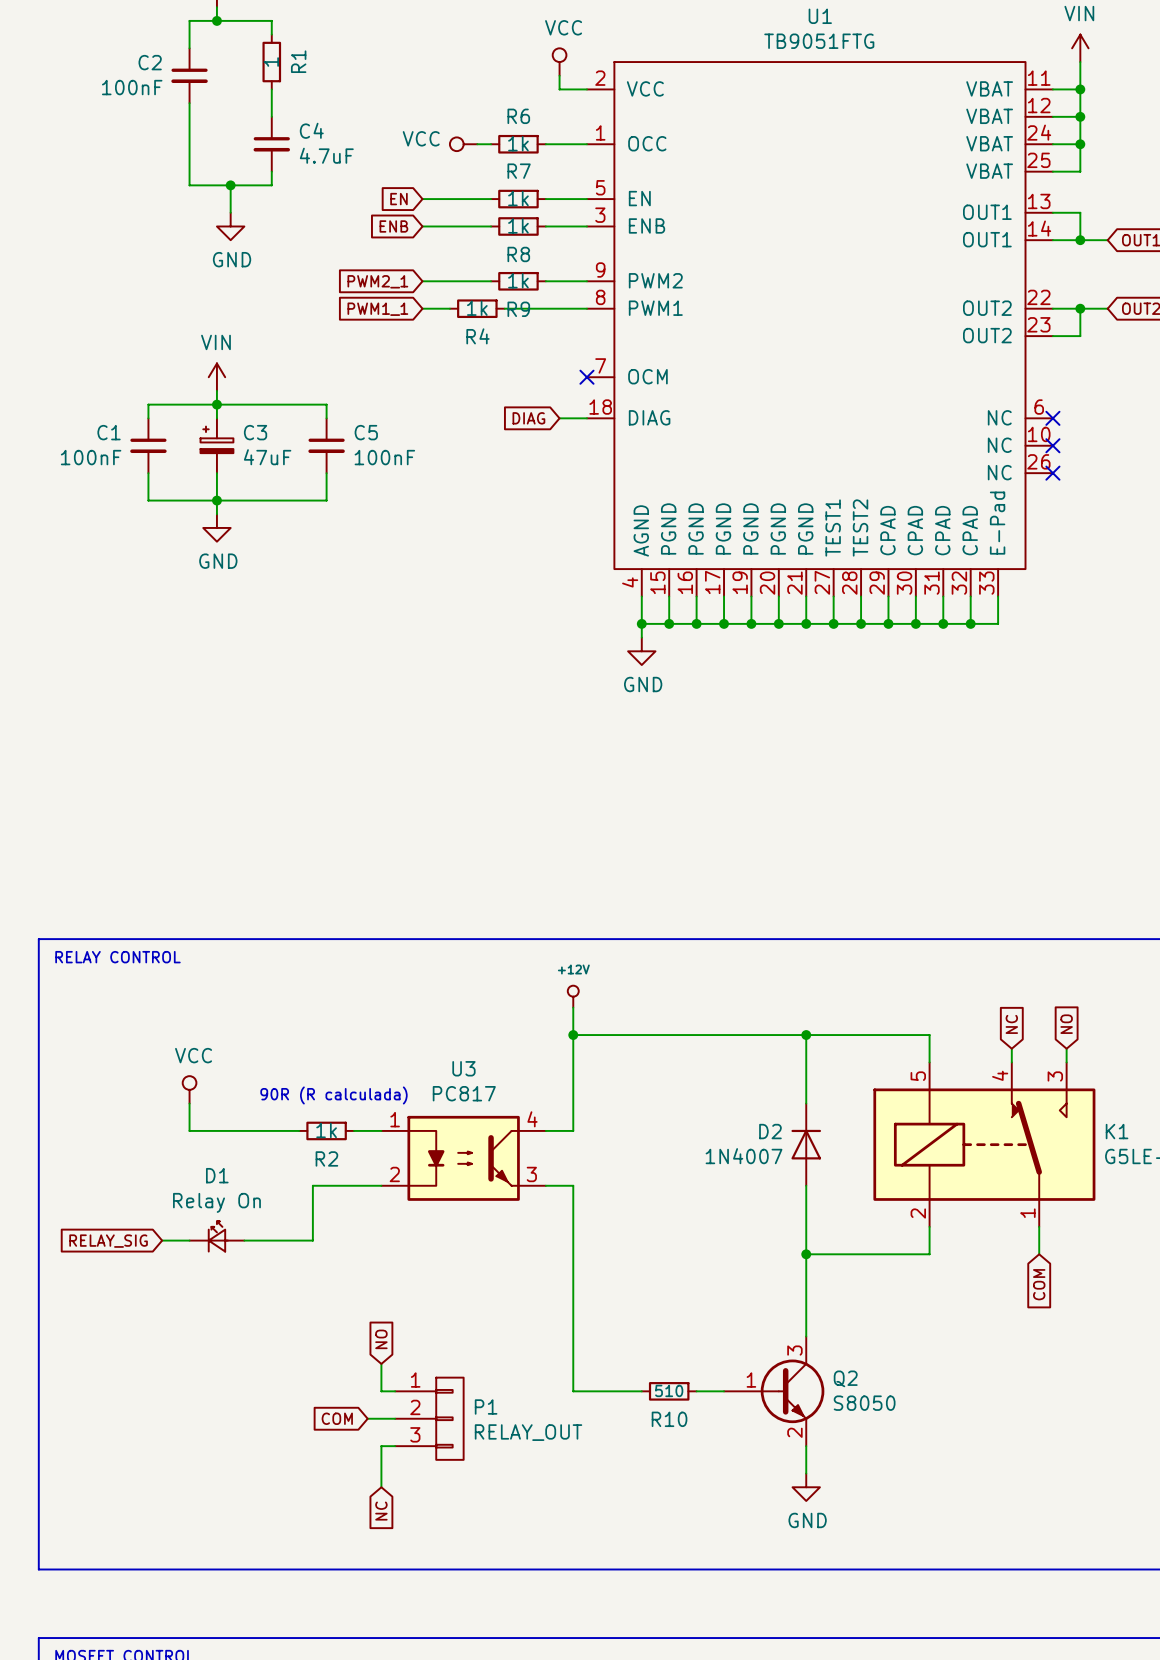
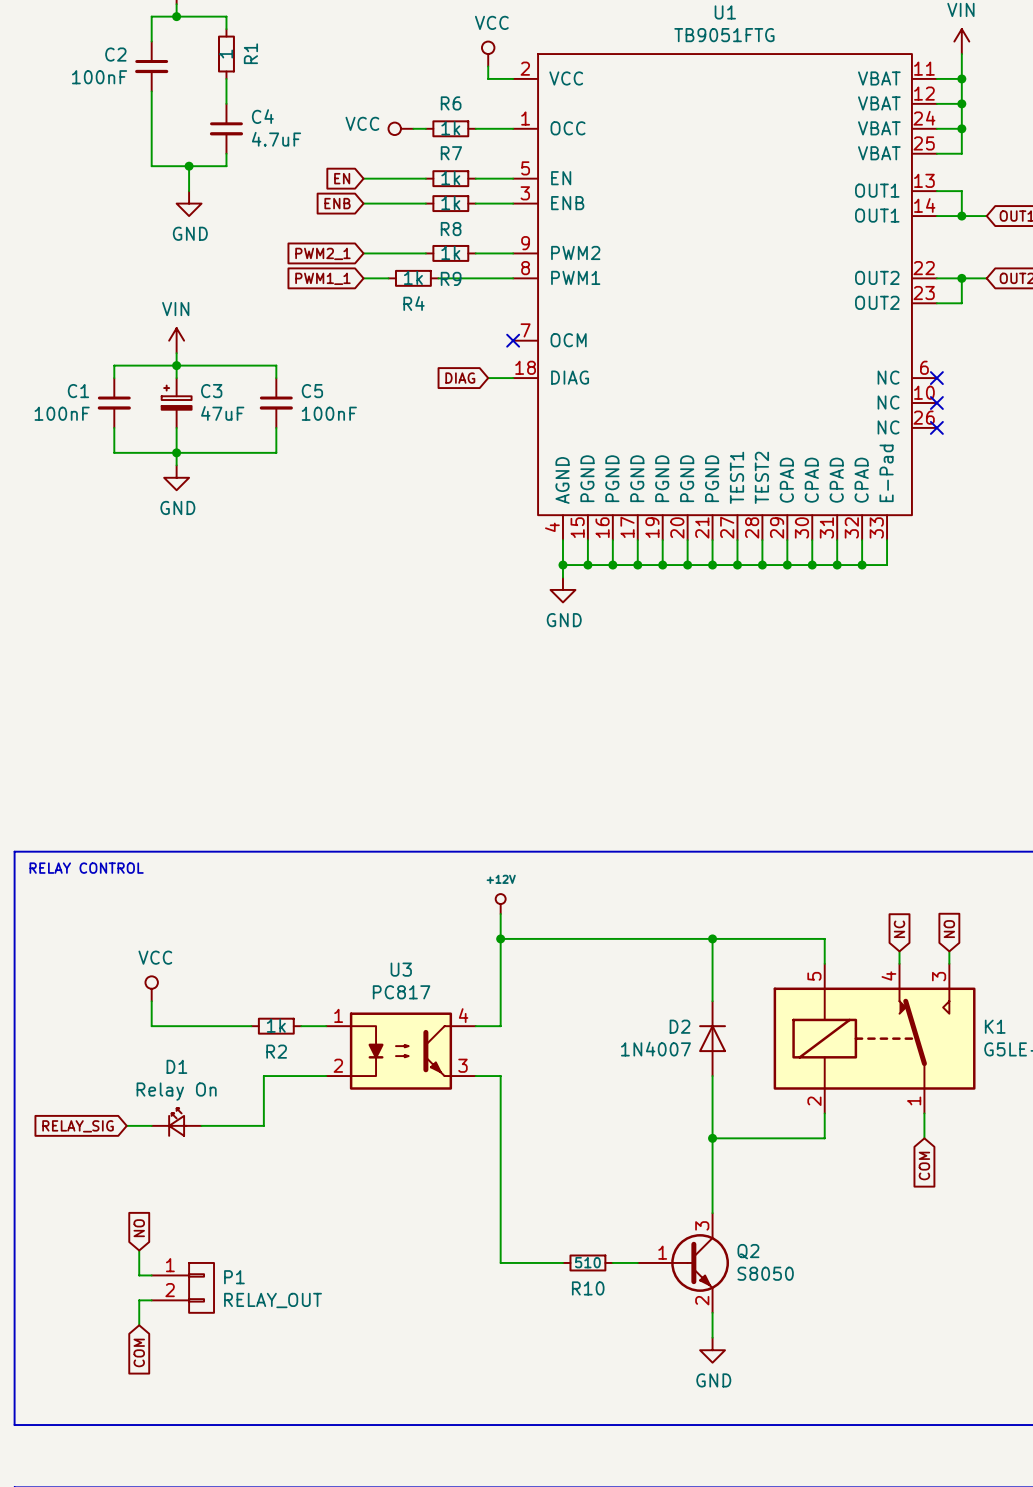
text: 90R (R calculada) (333, 1095) -> none
global label position: NO (381, 1339) -> NO (139, 1228)
wire: (381, 1363) (381, 1391) (395, 1391) -> (139, 1250) (139, 1275) (151, 1275)
P1 symbol: [395, 1377, 464, 1460] -> [151, 1262, 215, 1313]
global label rotation: 0° (337, 1418) -> 90° counterclockwise (139, 1352)
global label position: COM (337, 1418) -> COM (139, 1352)
wire: (367, 1418) (395, 1418) -> none
wire: none -> (151, 1300) (139, 1300) (139, 1325)
wire: (395, 1446) (381, 1446) (381, 1487) -> none
global label: NC (381, 1511) -> none

